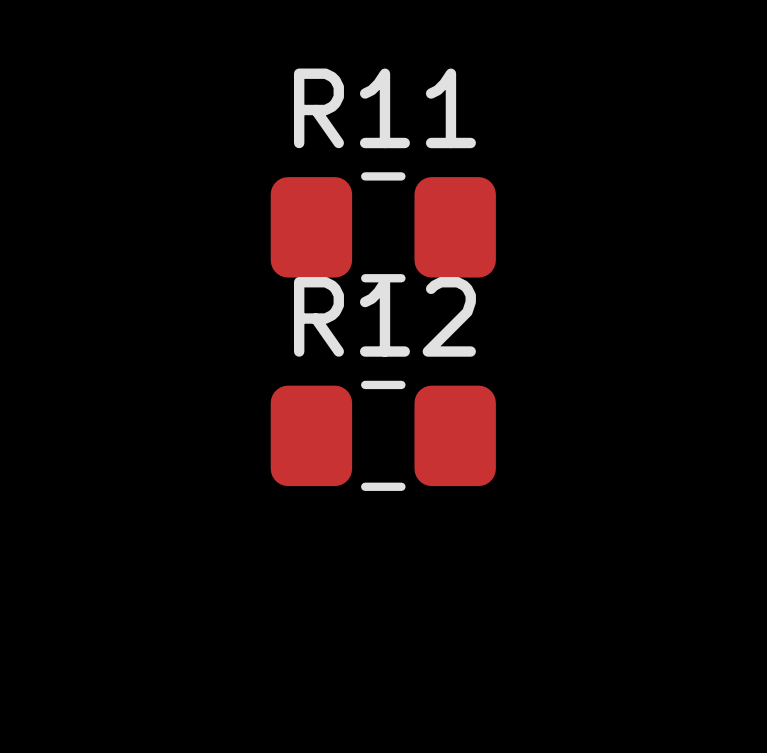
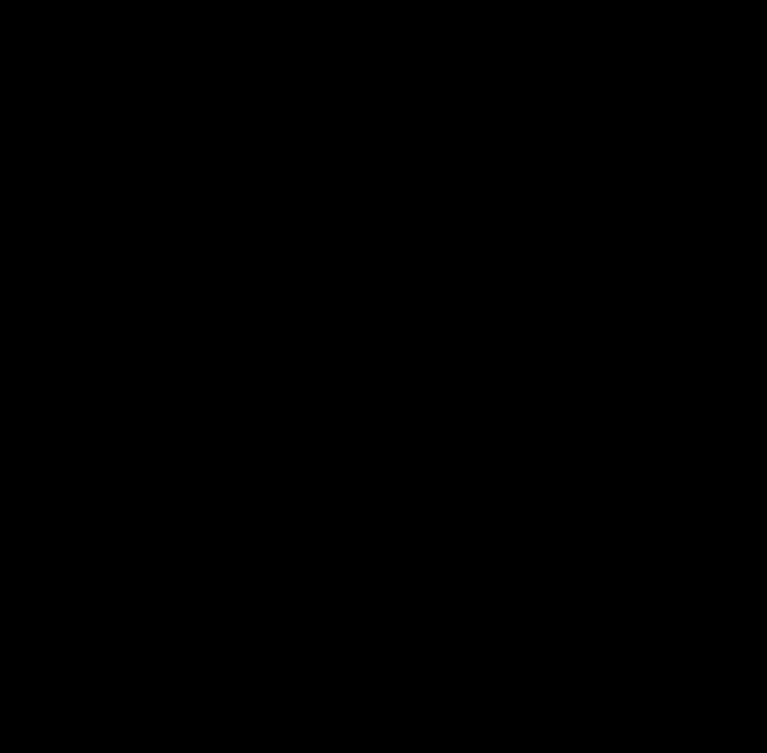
R11: (383, 227) -> none
R12: (383, 435) -> none

